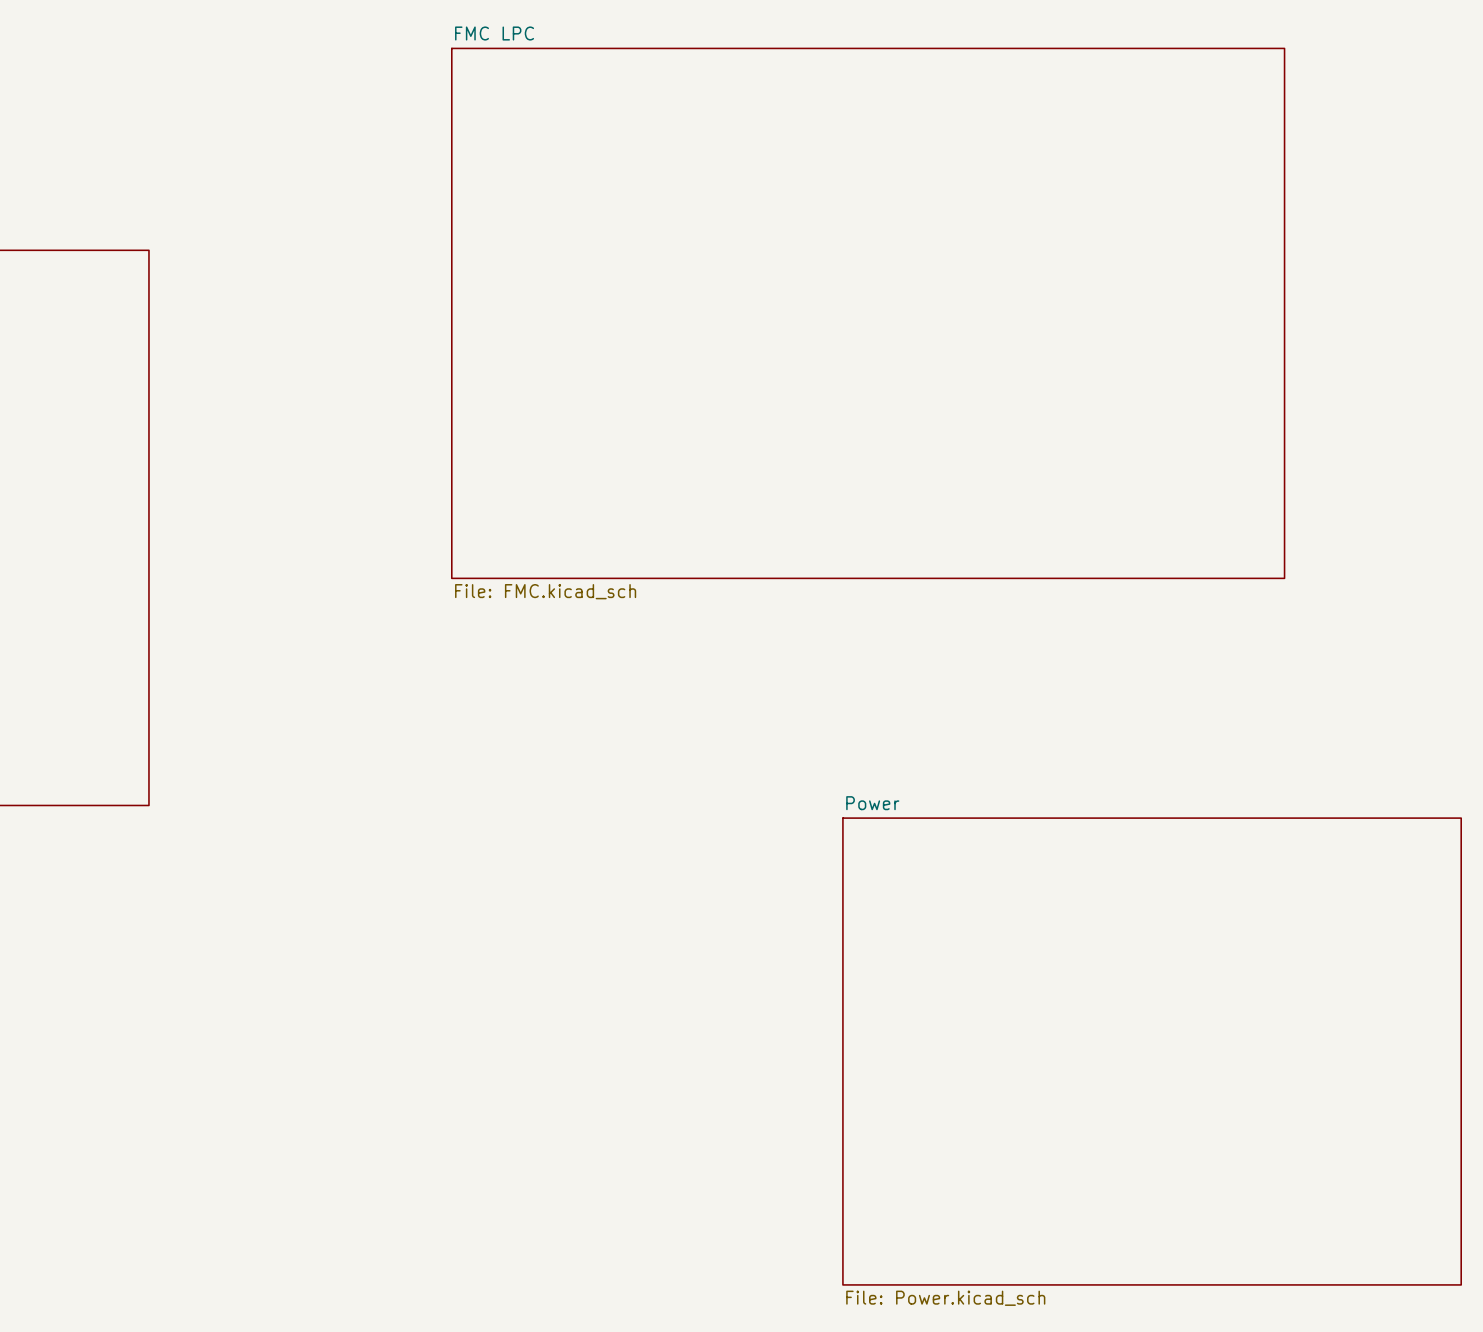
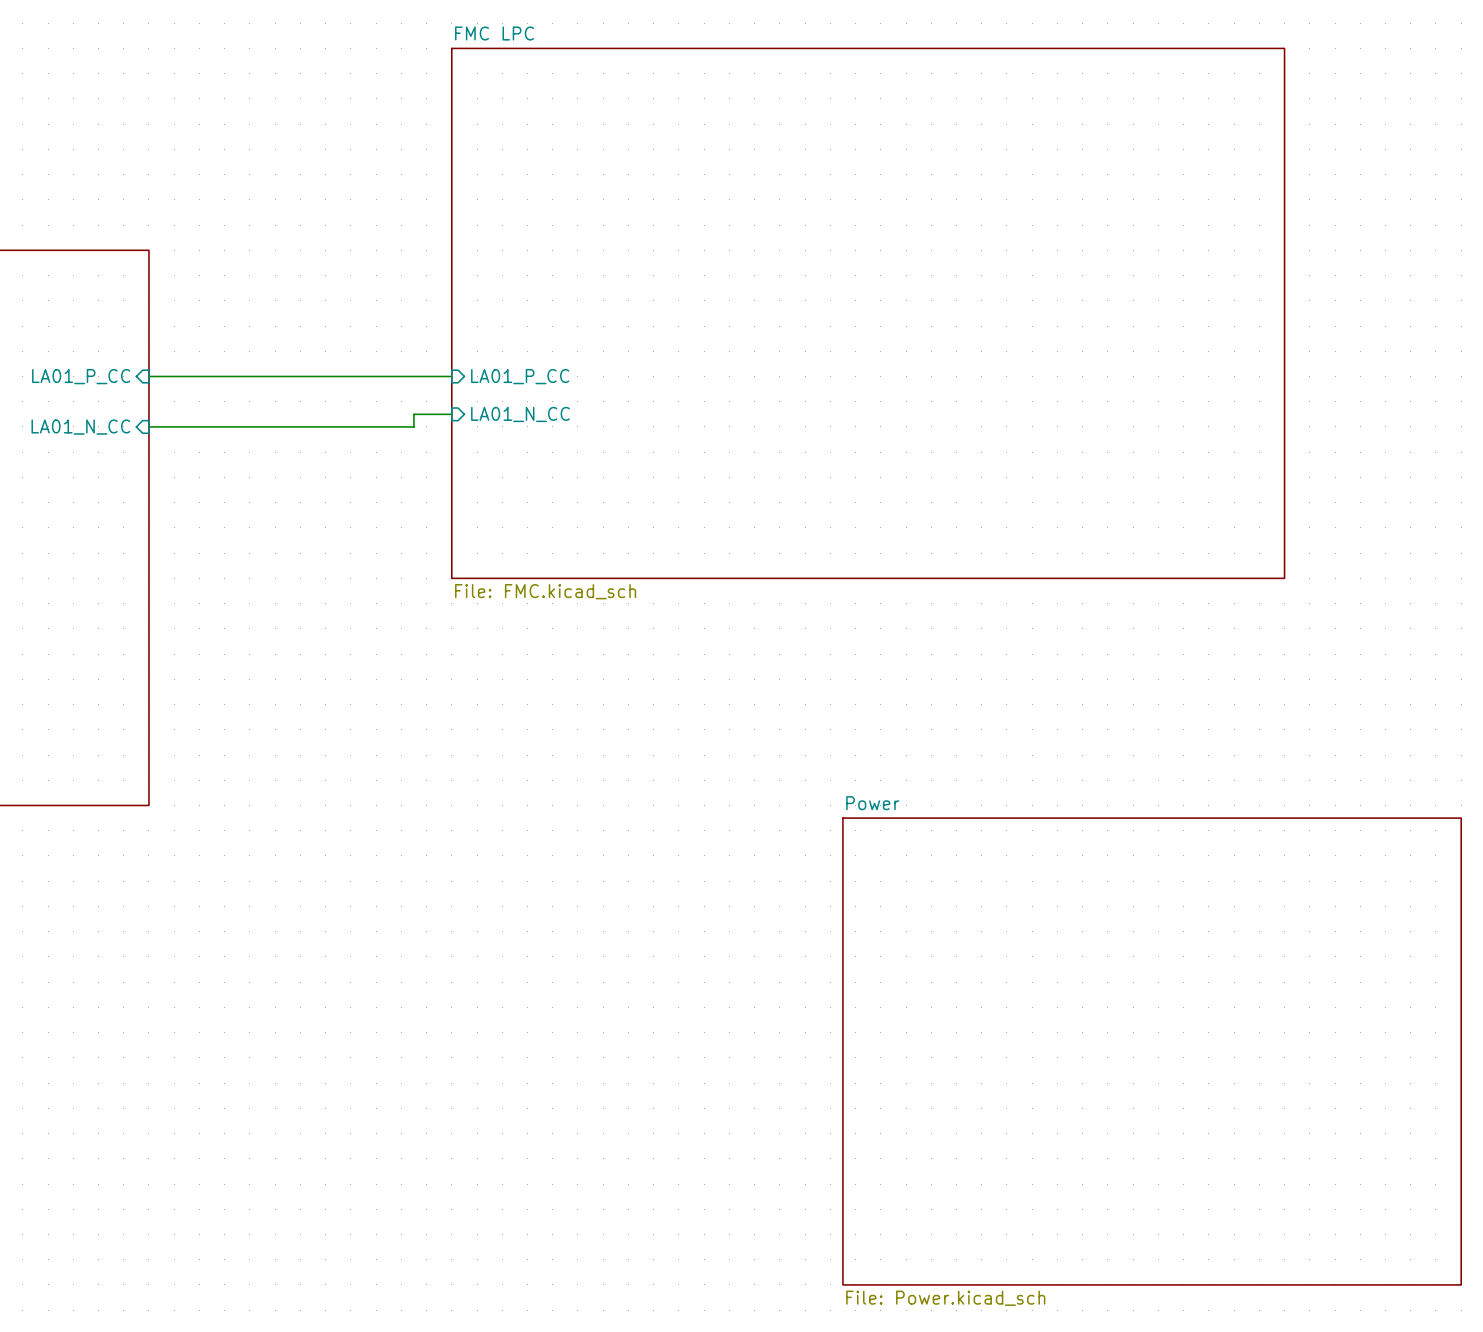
sheet pin: none -> LA01_P_CC (81, 376)
wire: none -> (148, 376) (451, 376)
sheet pin: none -> LA01_P_CC (520, 376)
wire: none -> (451, 414) (413, 414) (413, 426) (148, 426)
sheet pin: none -> LA01_N_CC (520, 414)
sheet pin: none -> LA01_N_CC (80, 427)

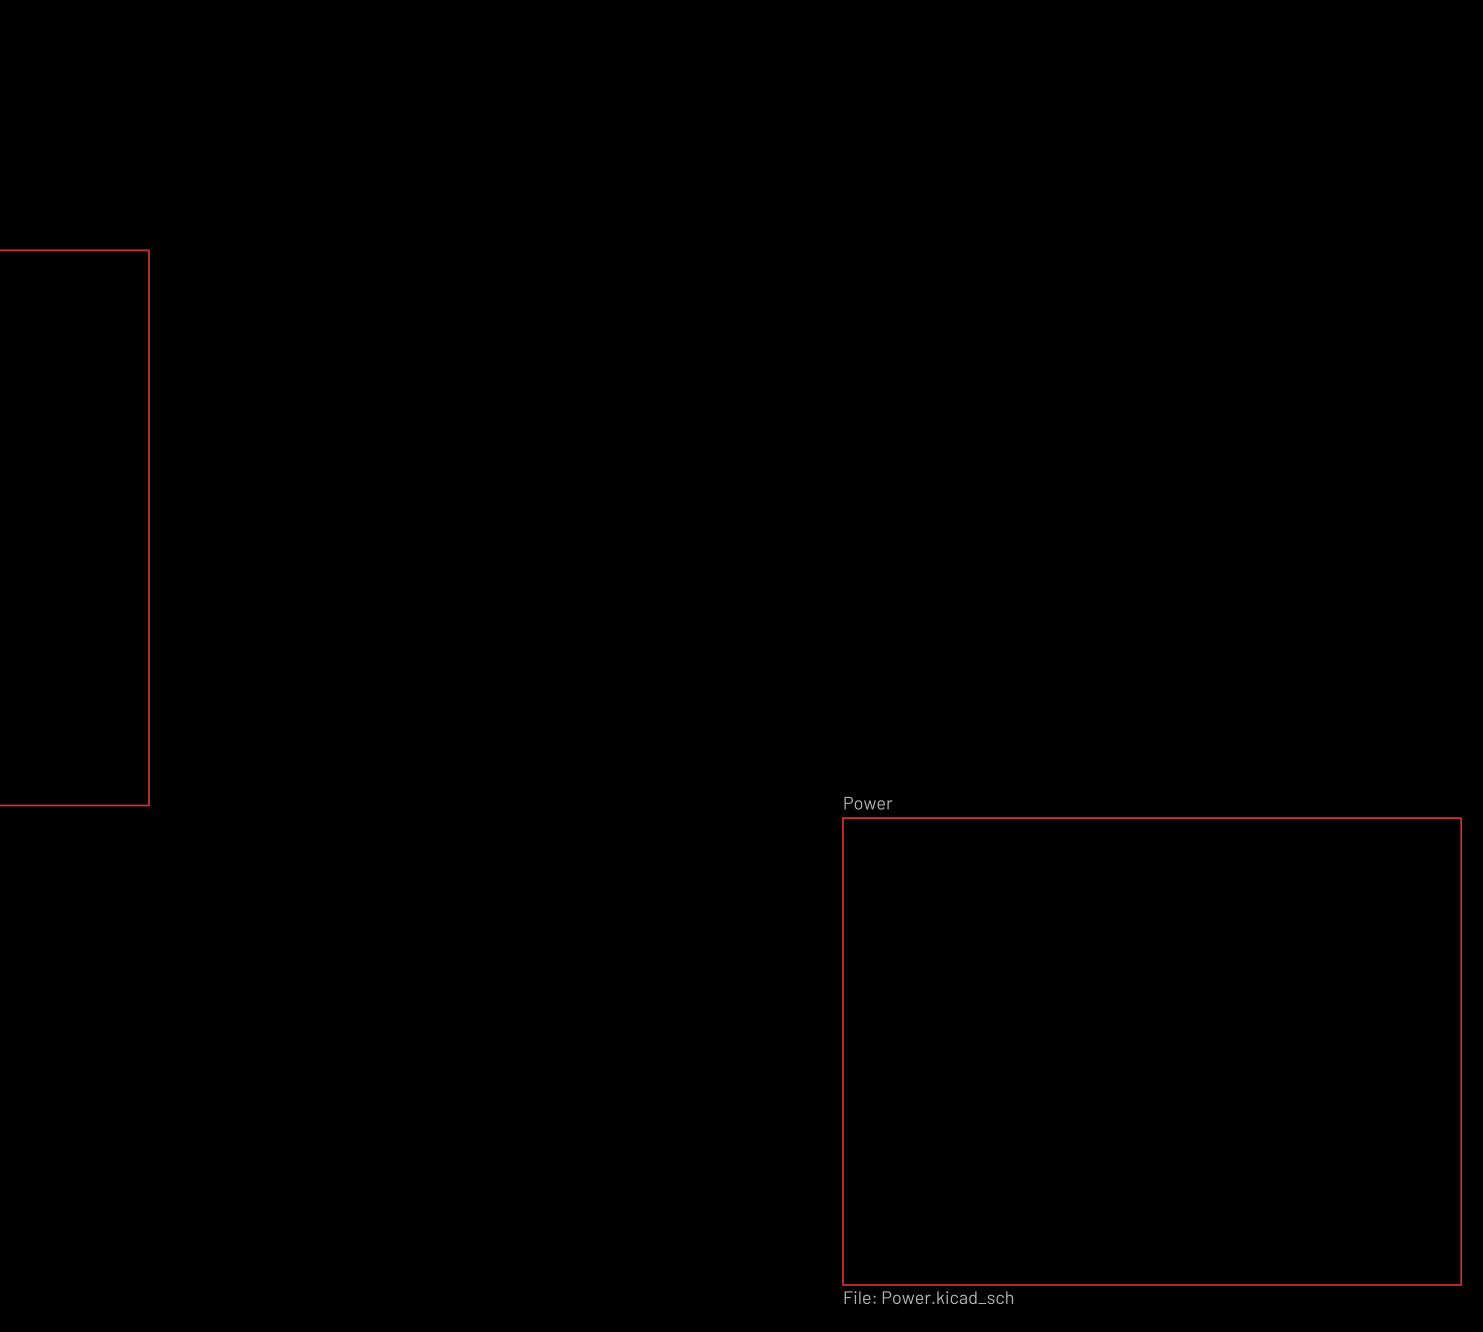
sheet FMC LPC: File: FMC.kicad_sch (868, 313) -> none
sheet pin: LA01_P_CC (81, 376) -> none
wire: (148, 376) (451, 376) -> none
sheet pin: LA01_P_CC (520, 376) -> none
wire: (451, 414) (413, 414) (413, 426) (148, 426) -> none
sheet pin: LA01_N_CC (520, 414) -> none
sheet pin: LA01_N_CC (80, 427) -> none

